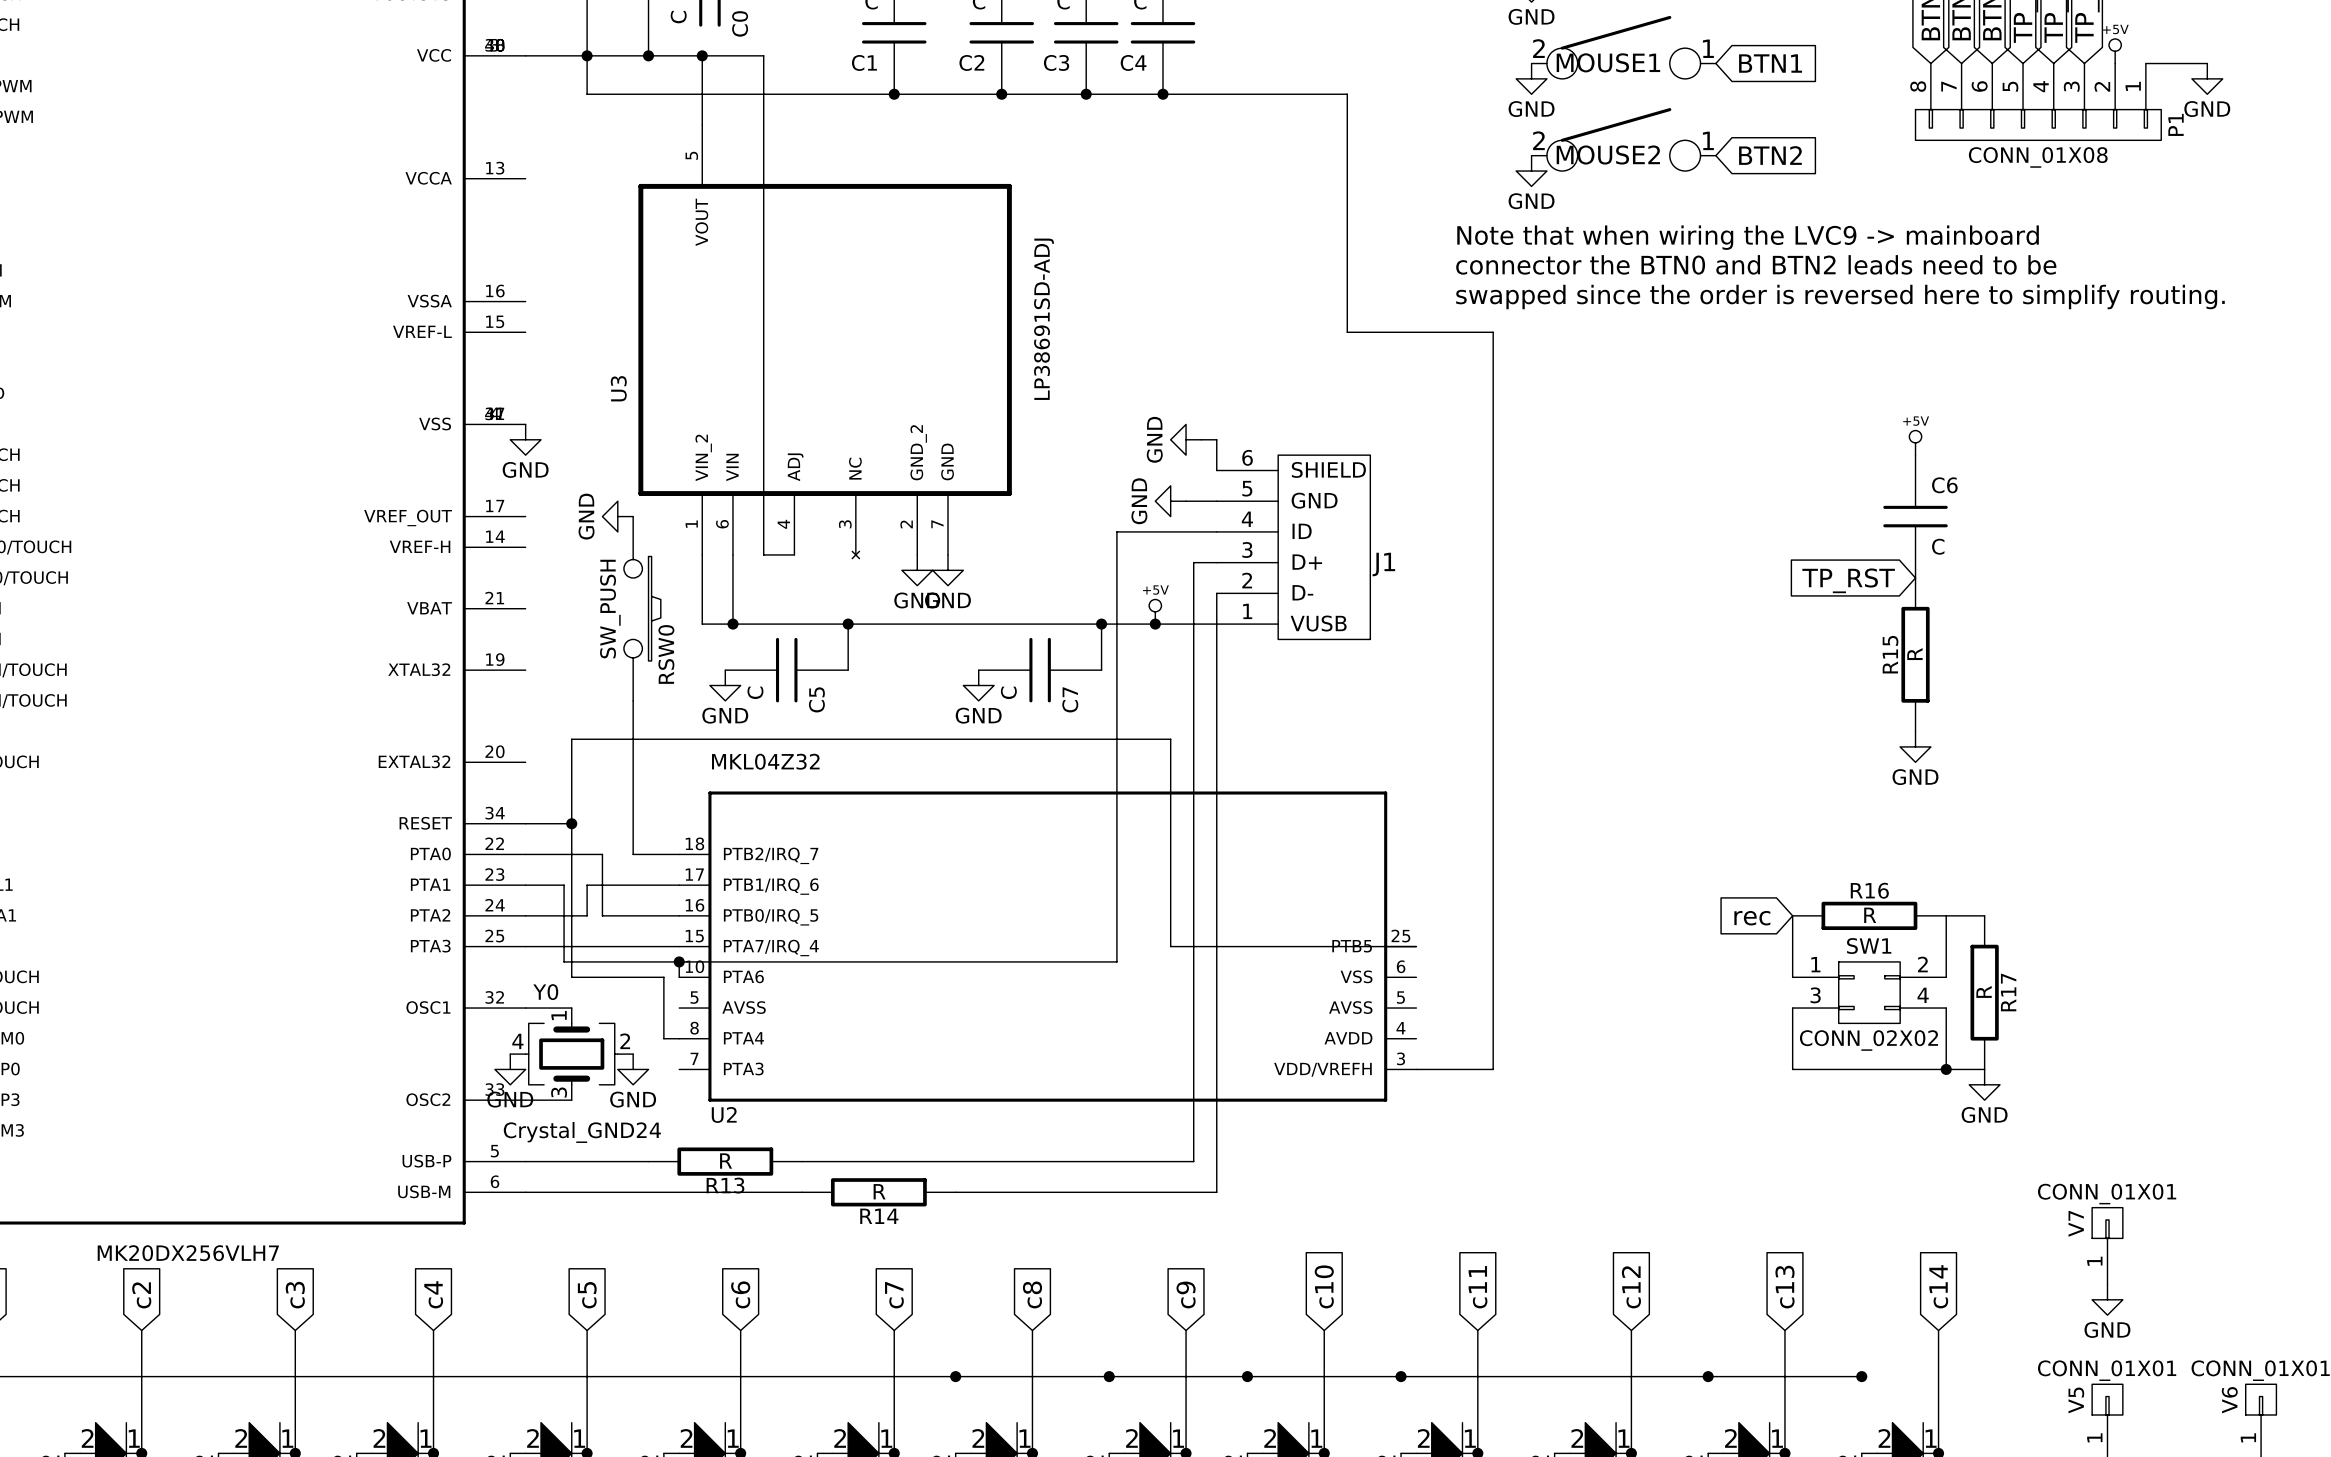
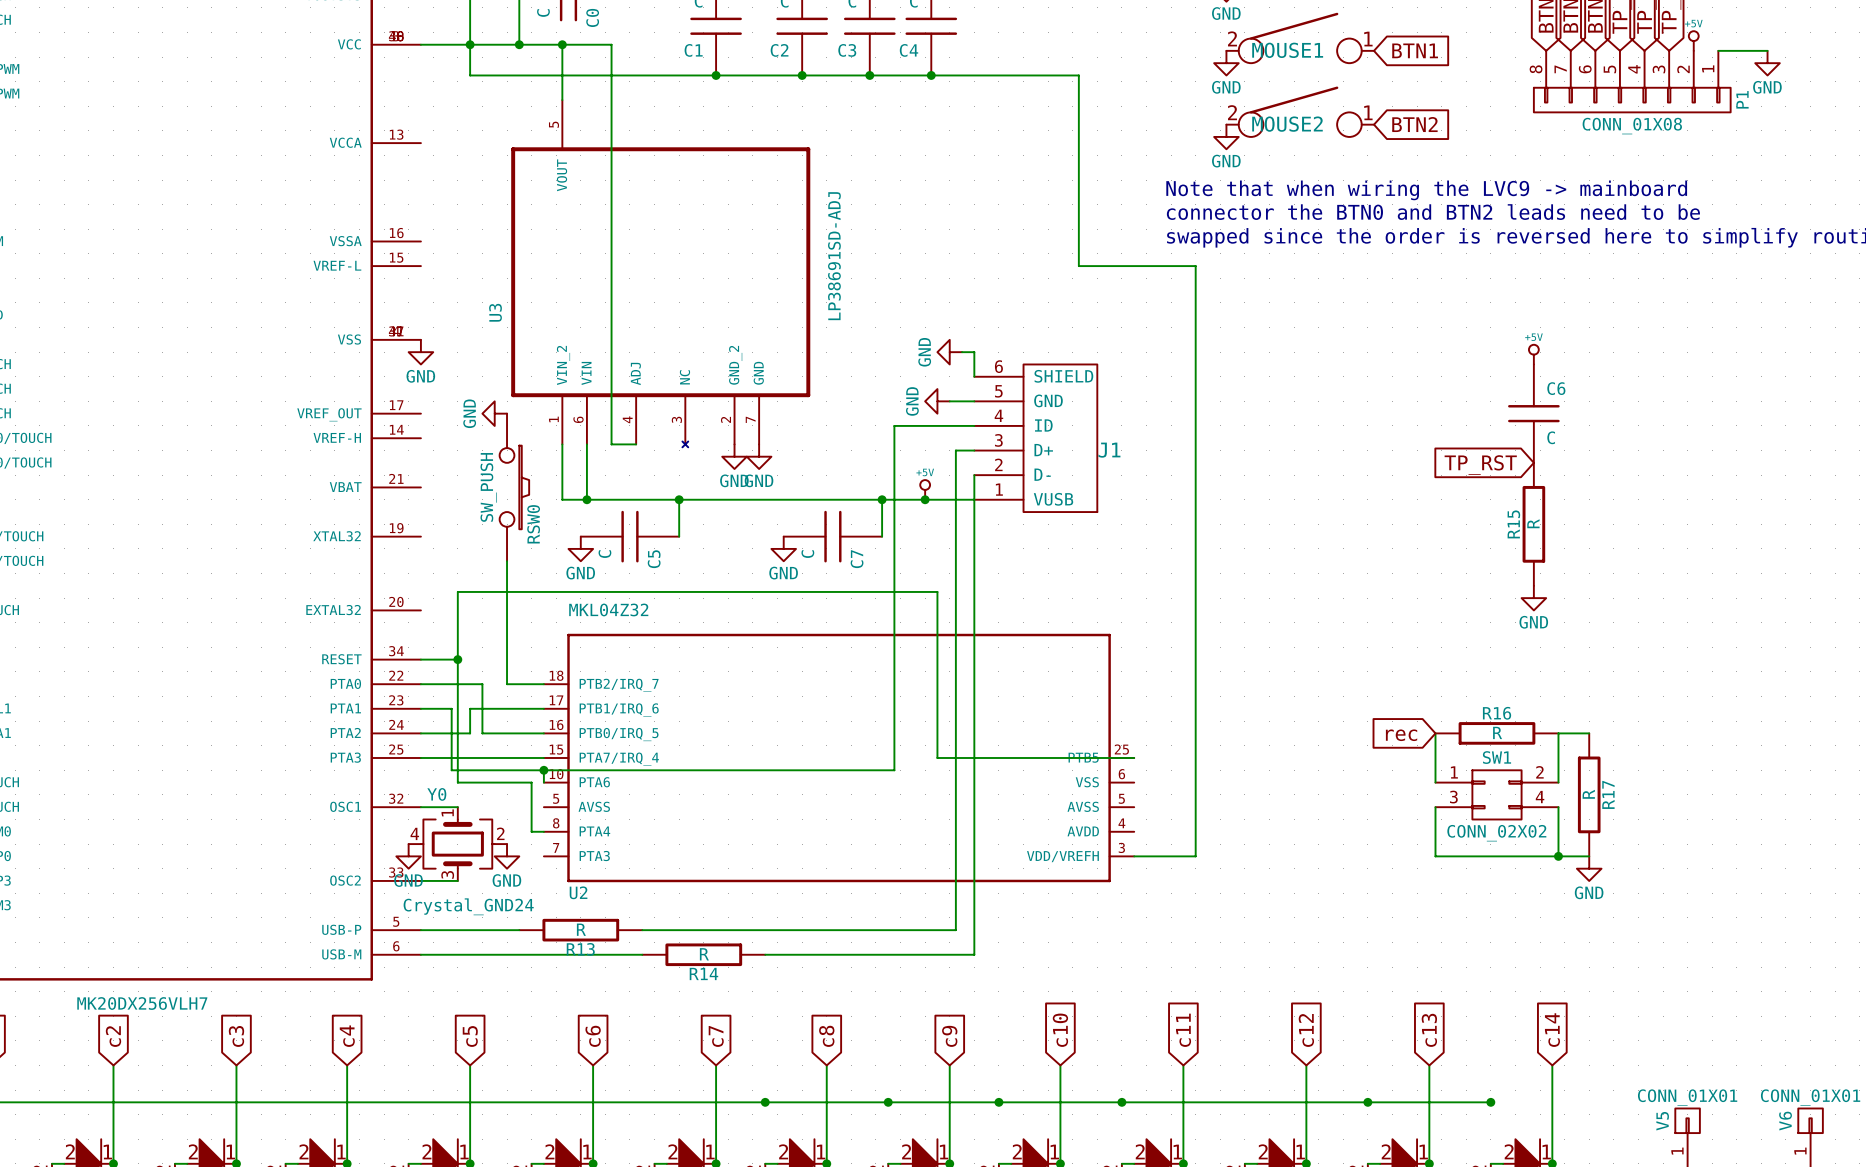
V7: CONN_01X01 (2107, 1246) -> none
power symbol: GND (2107, 1299) -> none

